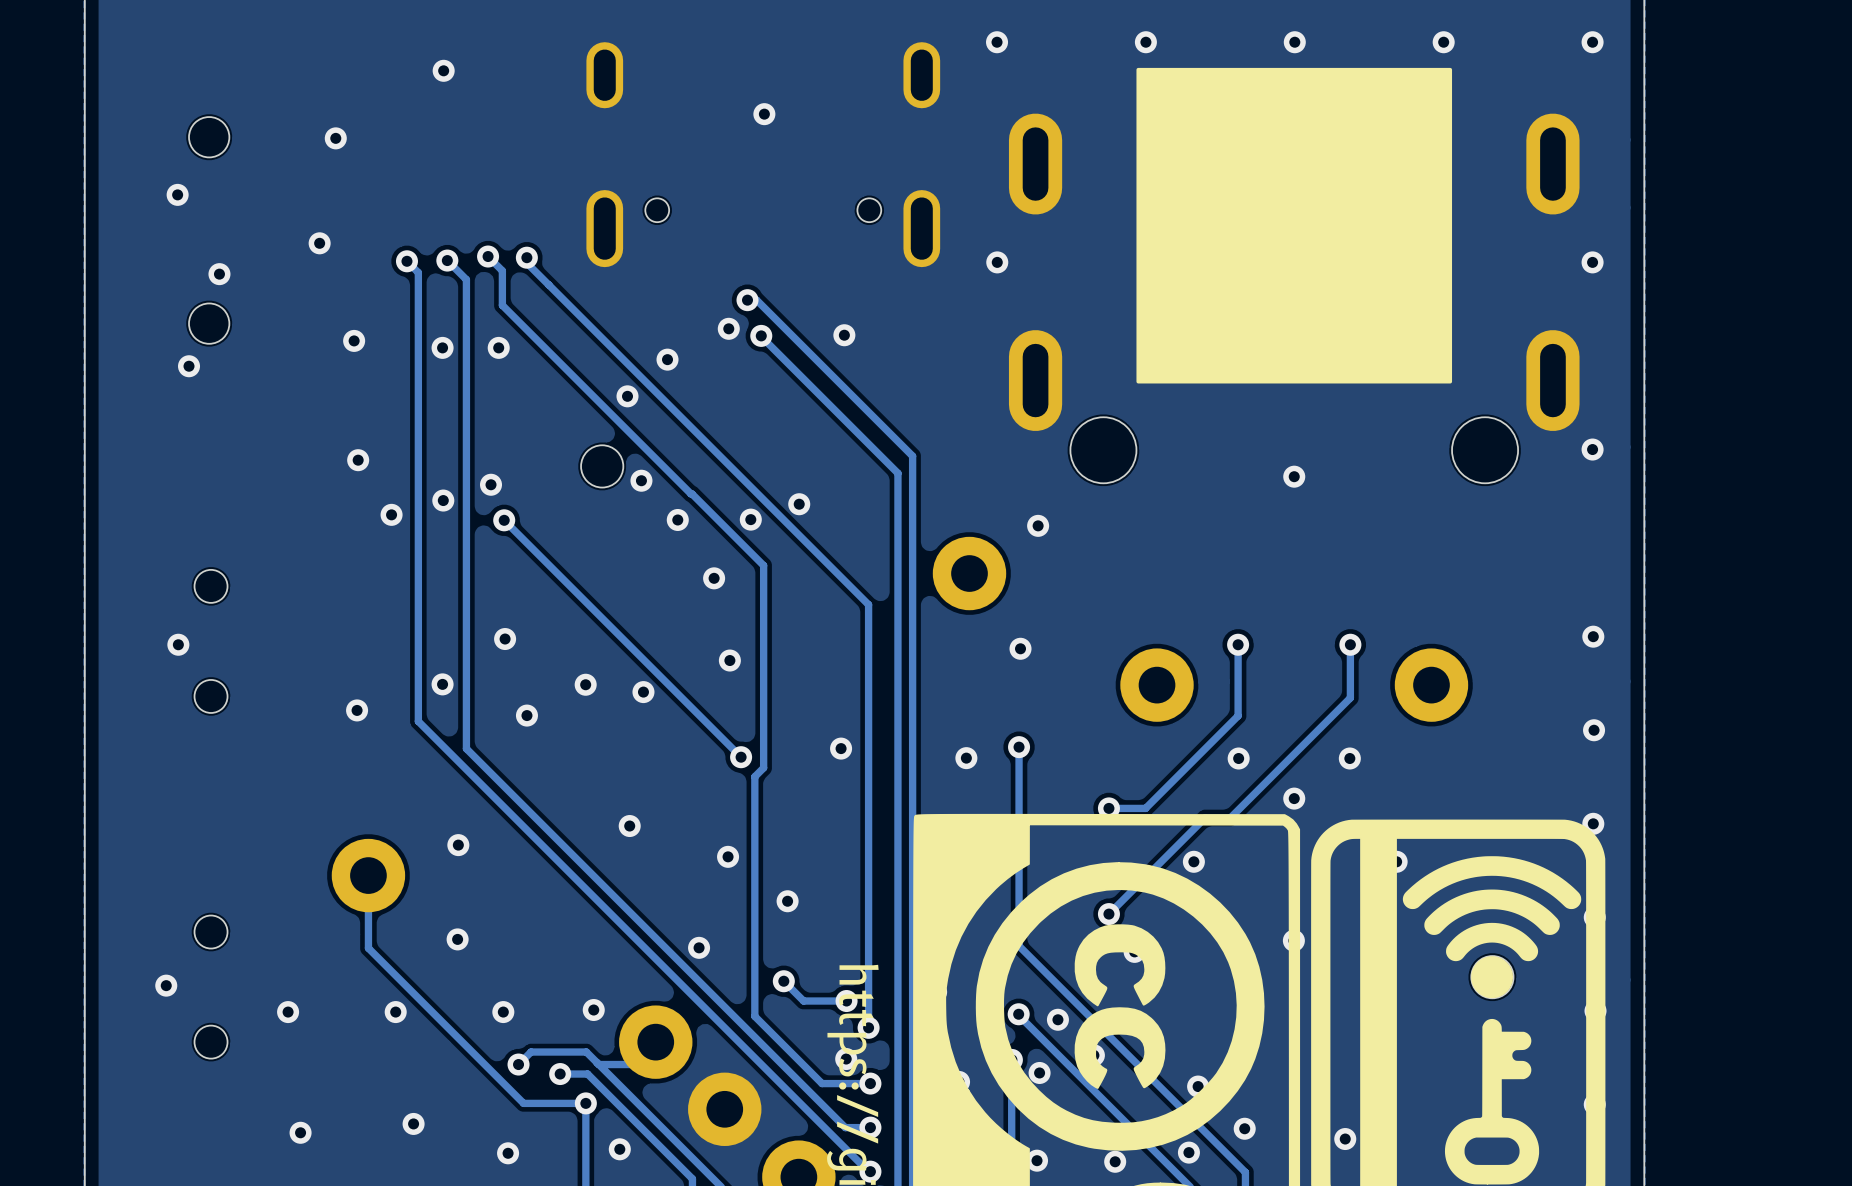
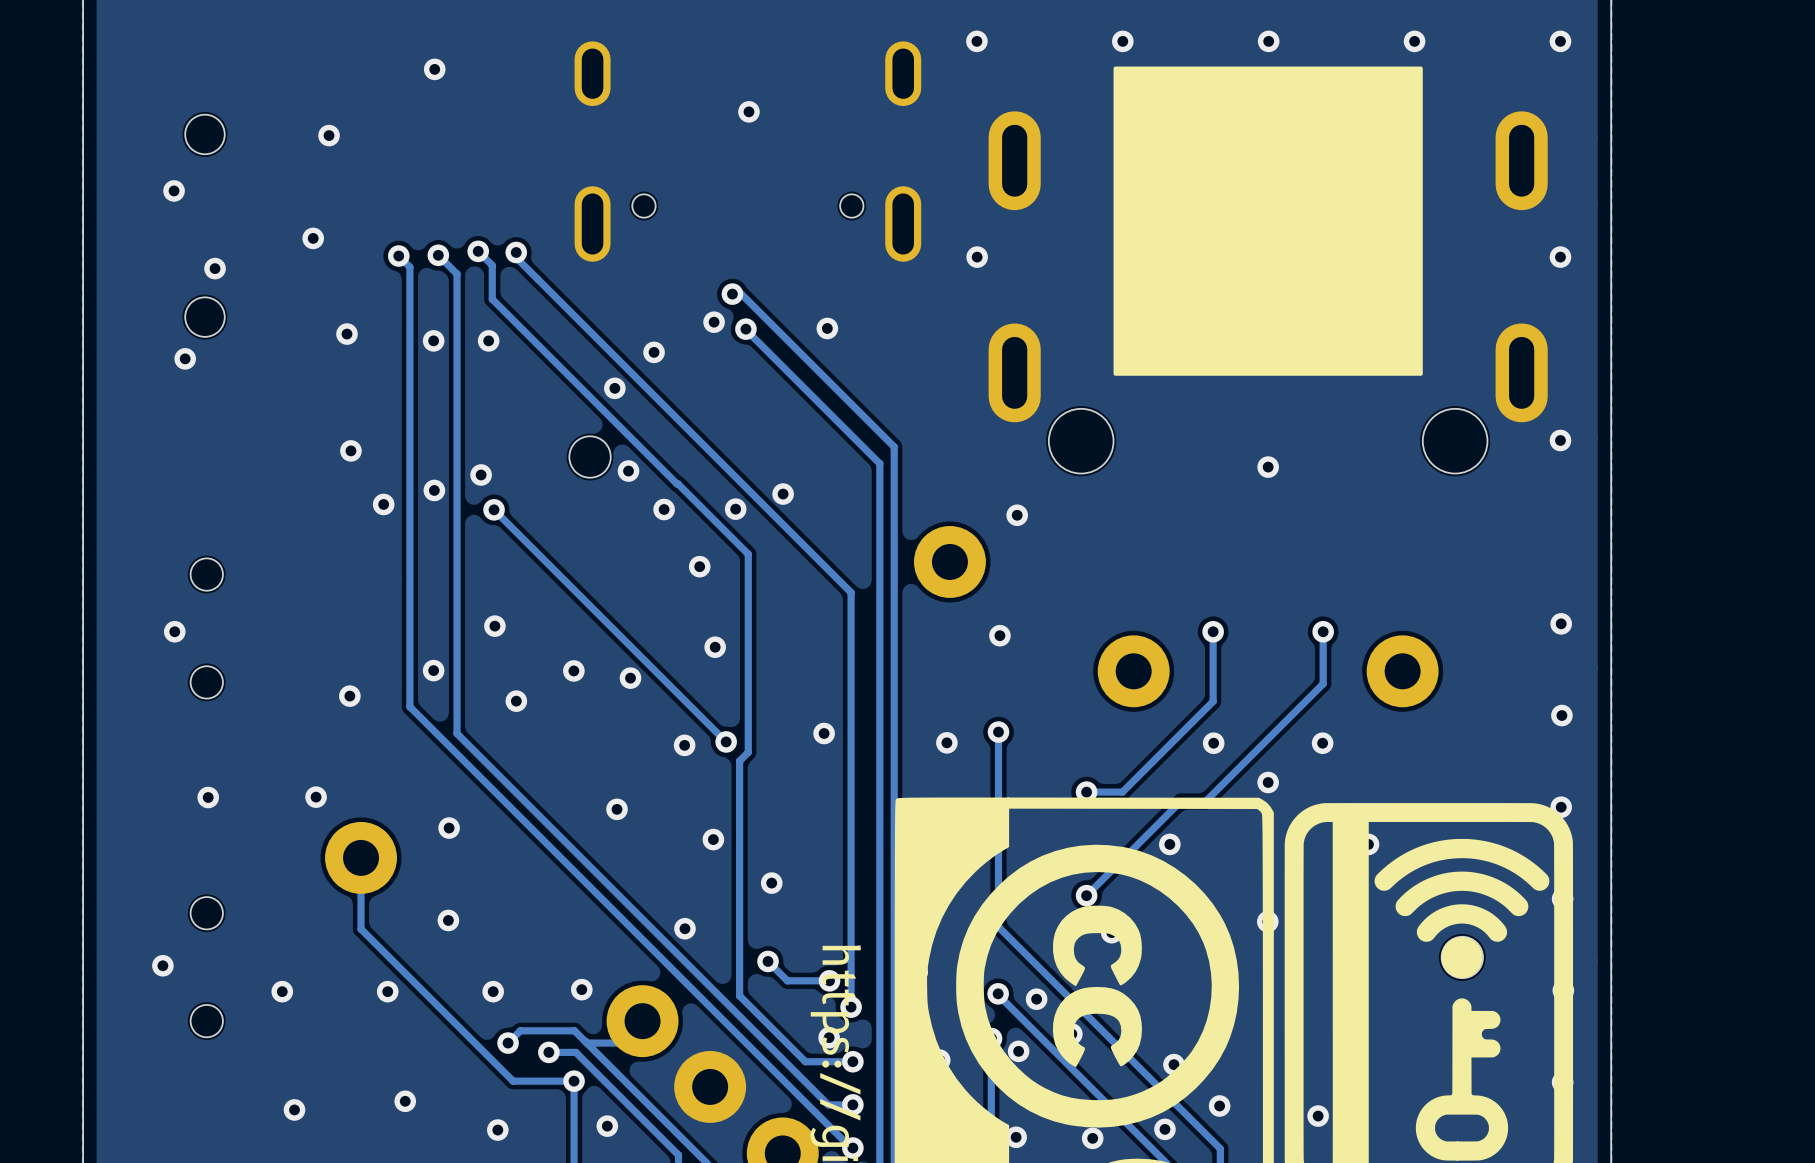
via: none -> (684, 745)
via: none -> (208, 797)
via: none -> (316, 797)

